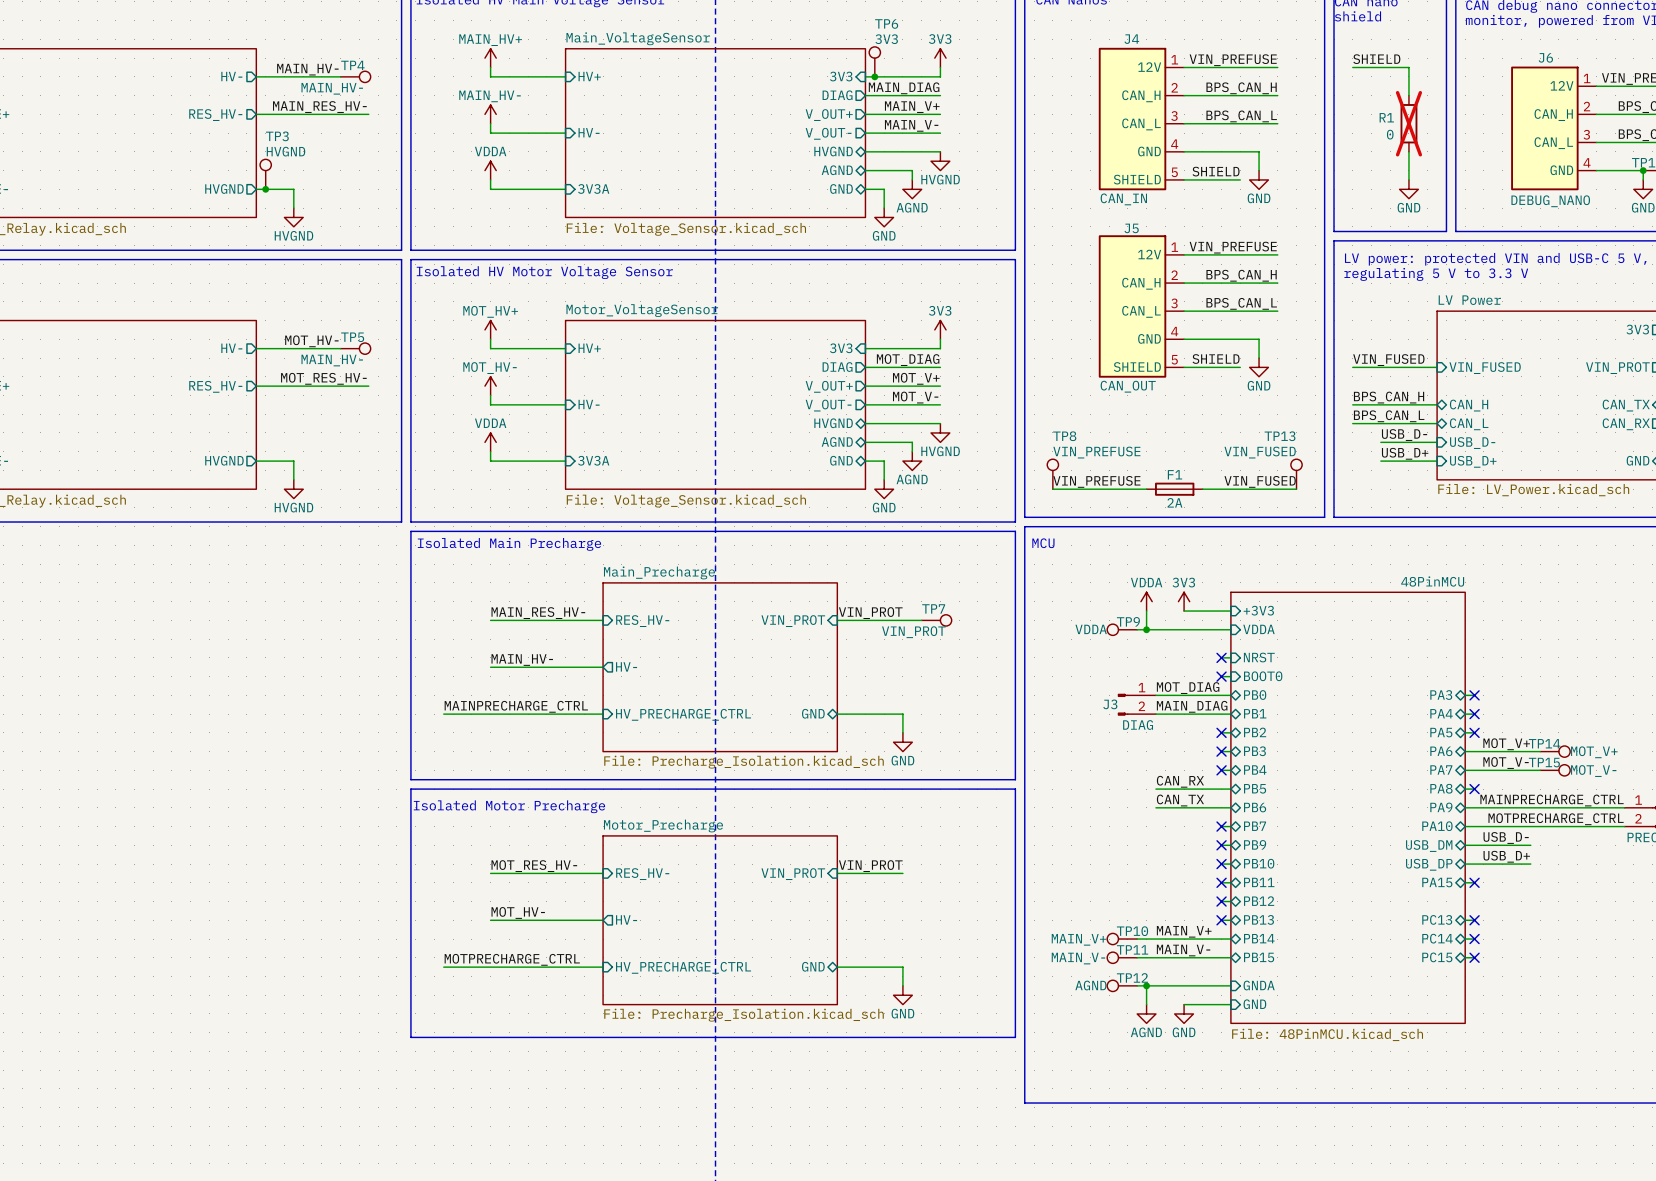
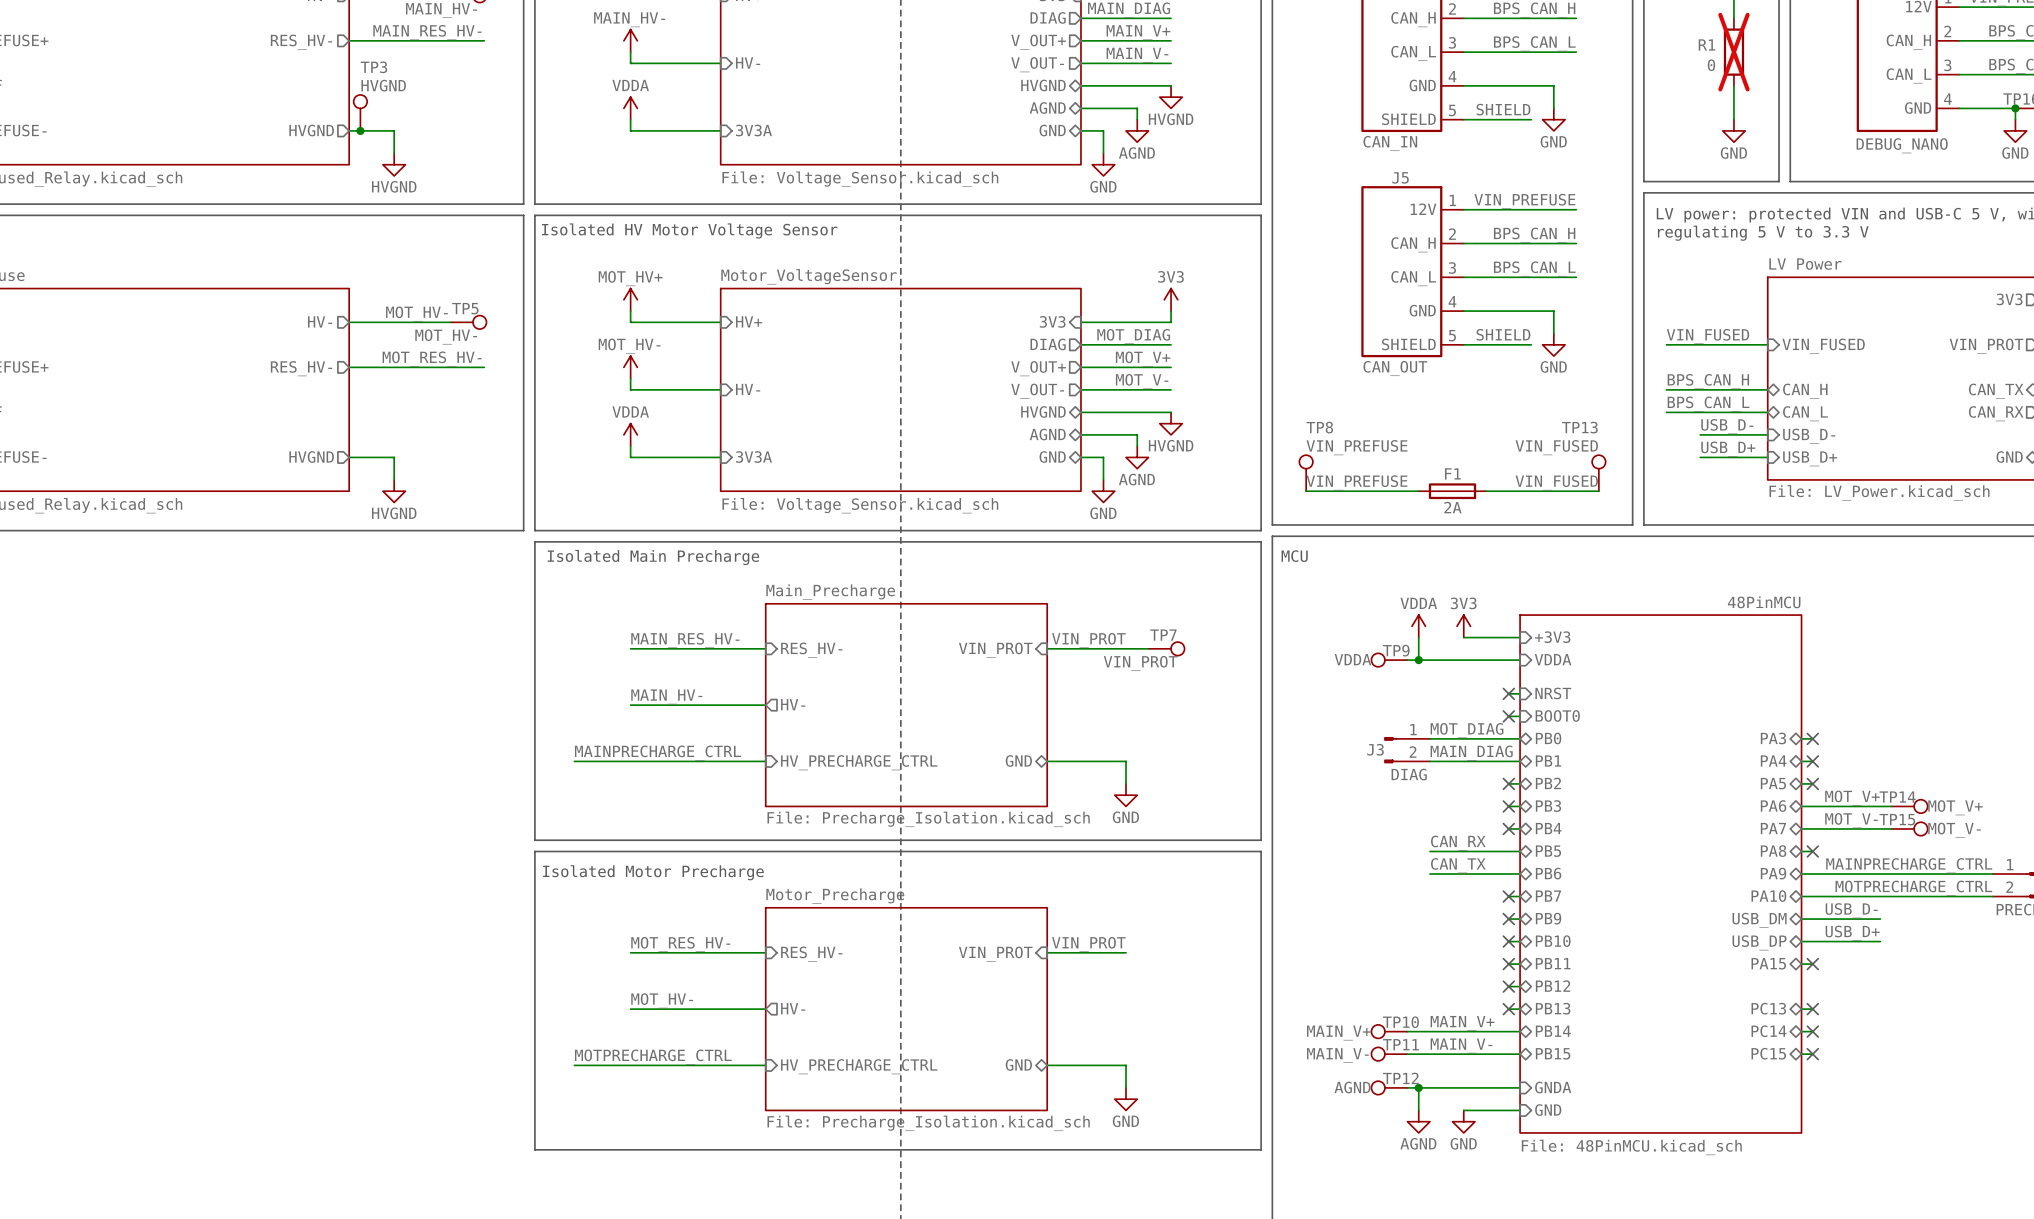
TP5 value: MAIN_HV- (332, 360) -> MOT_HV- (446, 336)

